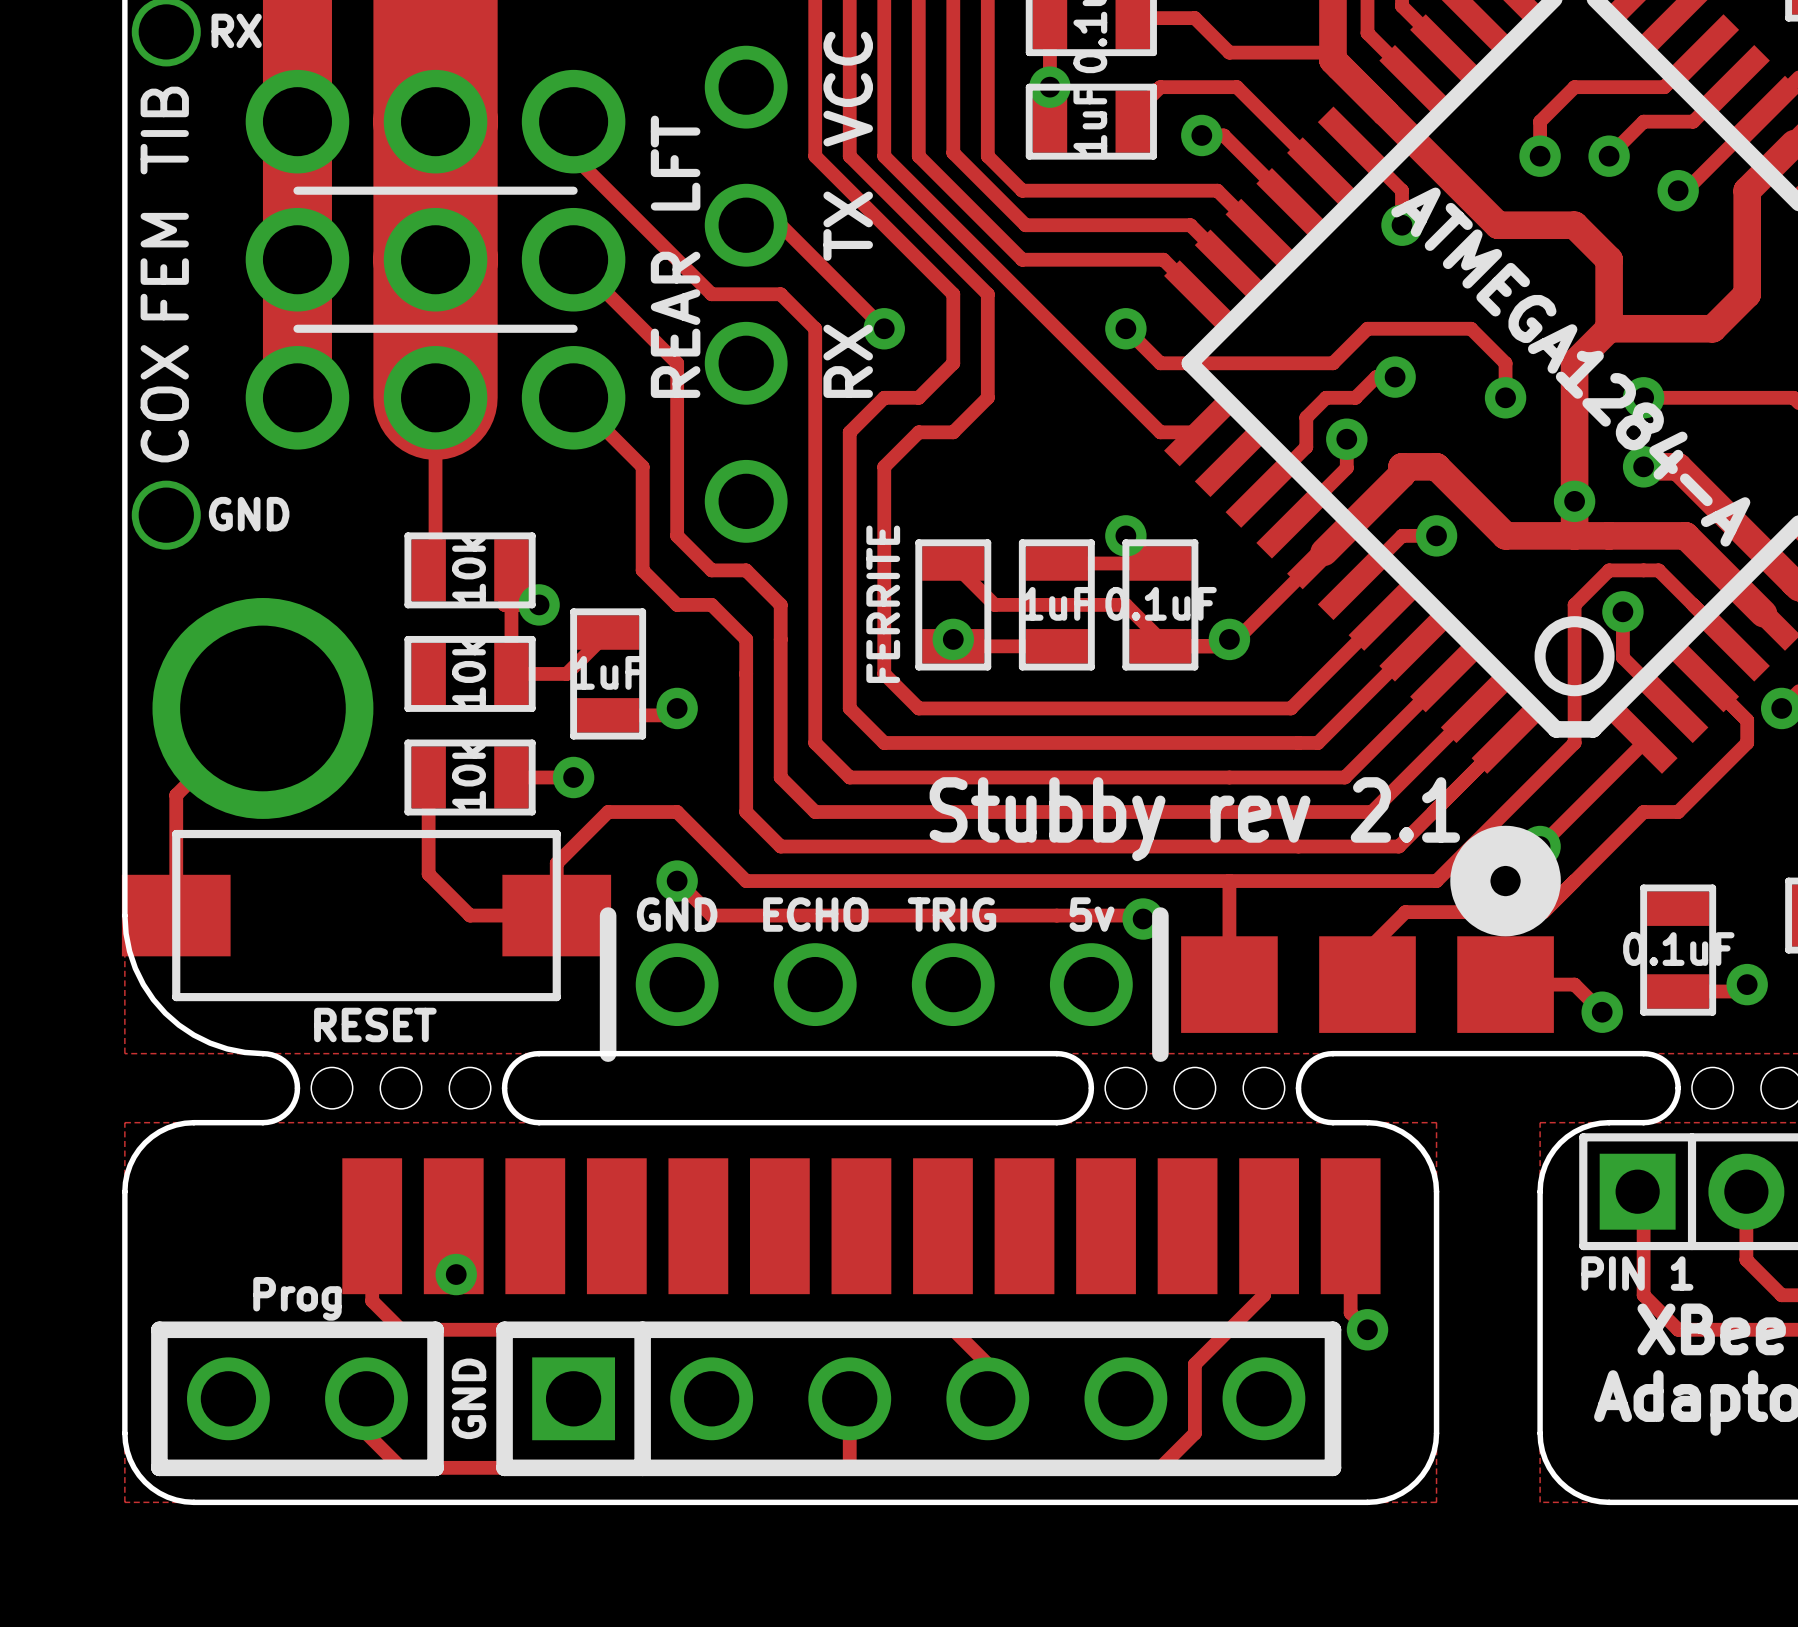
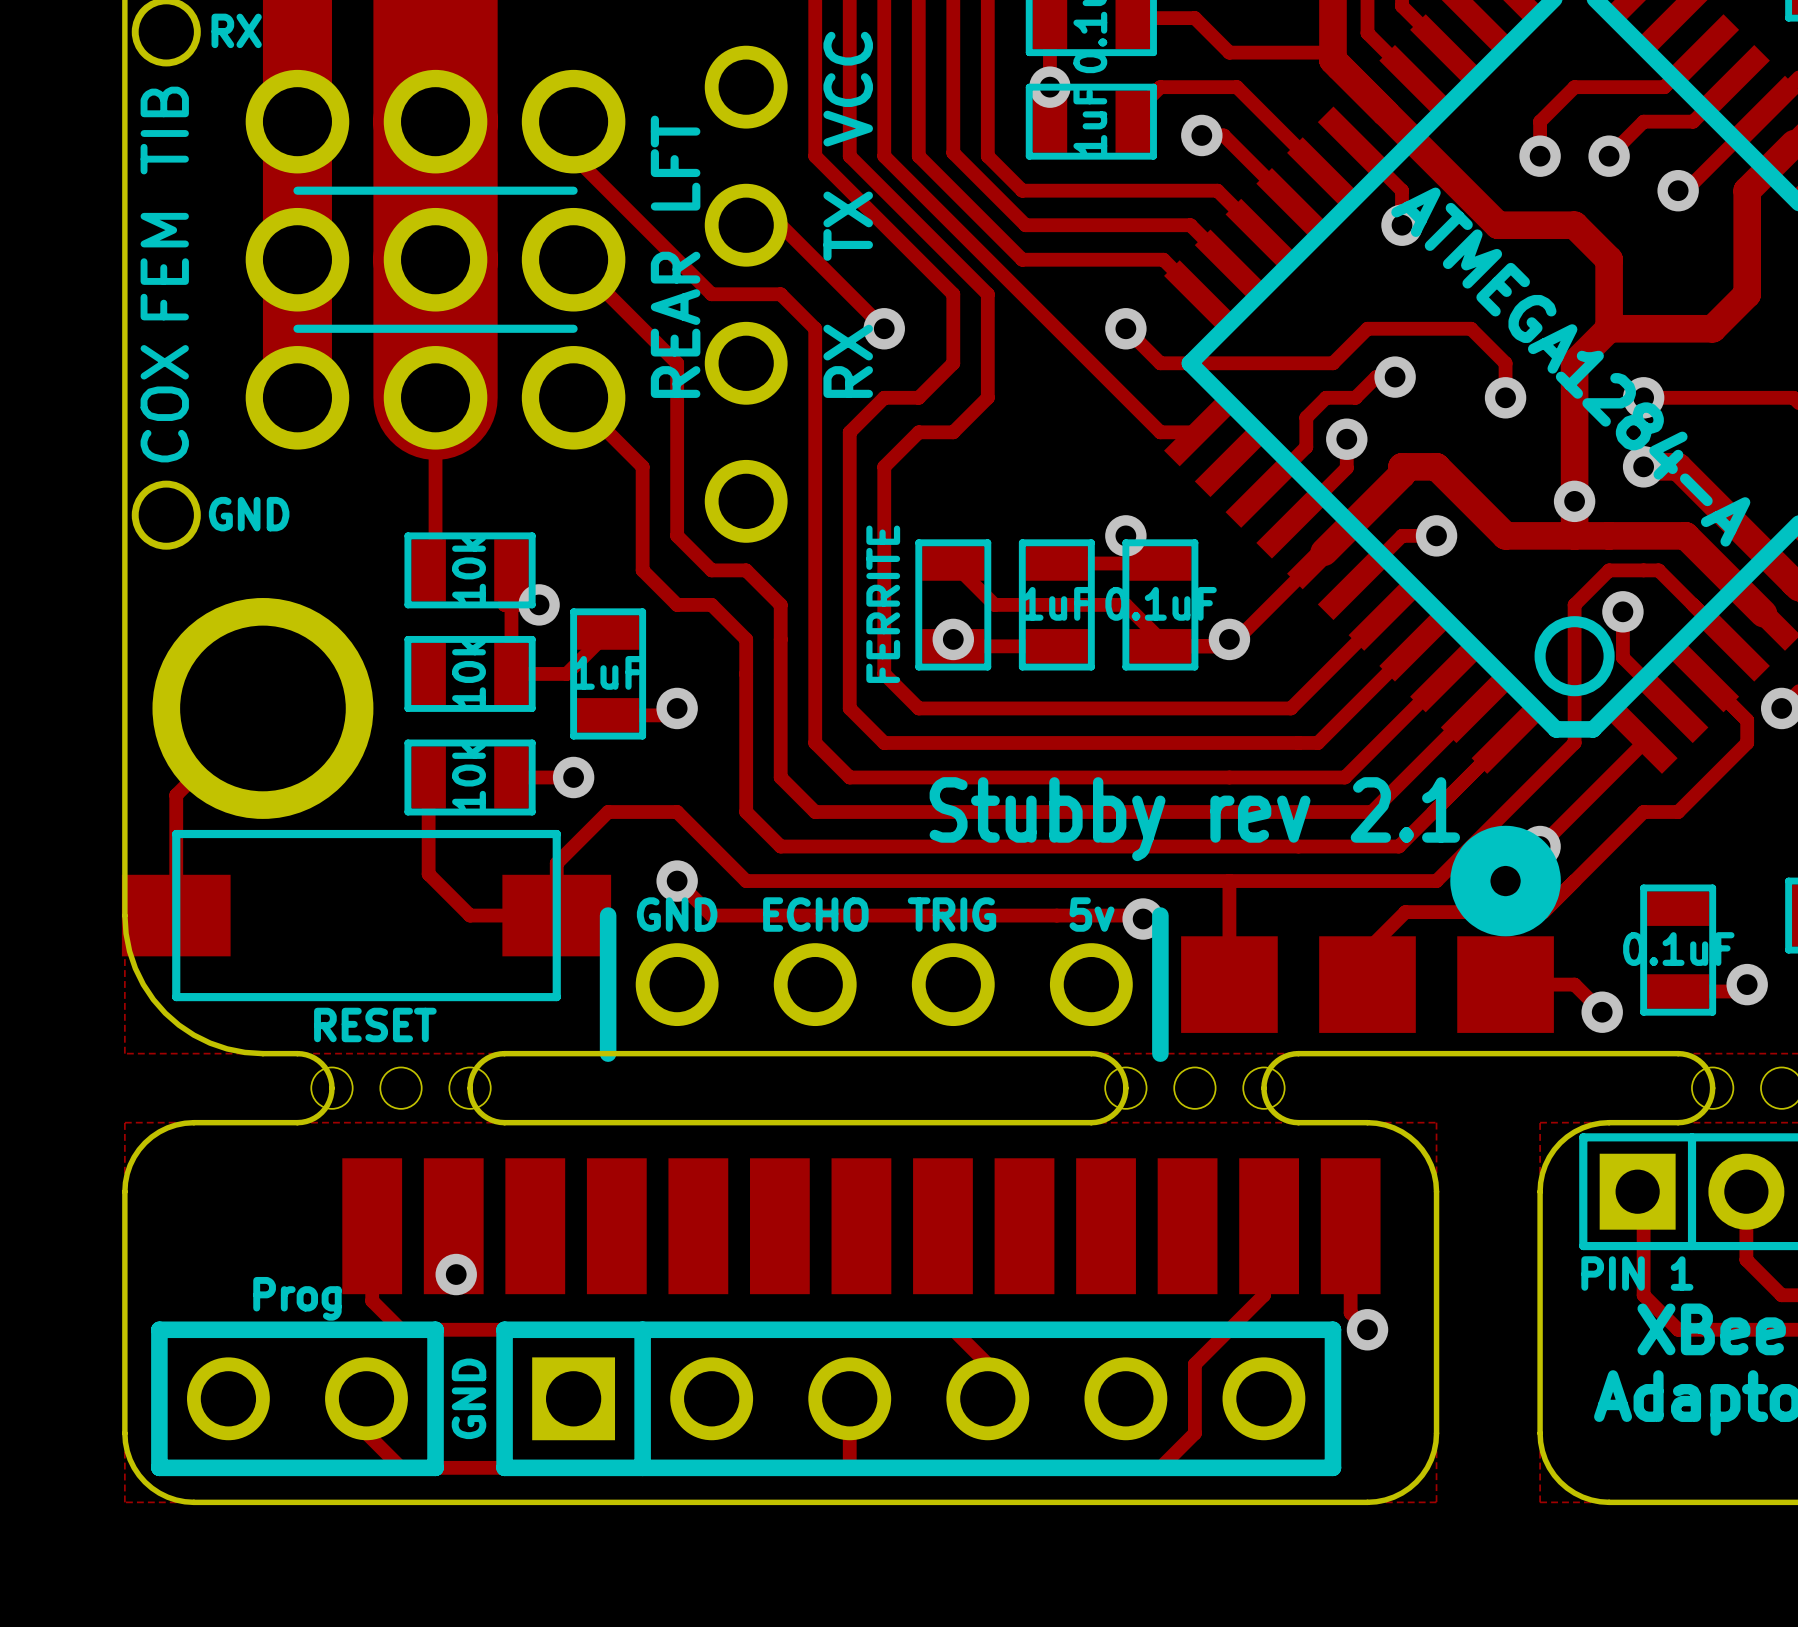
board edge: (262, 1053) (276, 1056) (287, 1063) (294, 1074) (297, 1088) (294, 1101) (287, 1112) (276, 1120) (262, 1122) -> (262, 1053) (301, 1053) (314, 1058) (327, 1070) (331, 1088) (327, 1105) (314, 1118) (301, 1122) (262, 1122)
board edge: (539, 1053) (525, 1056) (514, 1063) (507, 1074) (504, 1088) (507, 1101) (514, 1112) (525, 1120) (539, 1122) -> (539, 1053) (500, 1053) (487, 1058) (474, 1070) (470, 1088) (474, 1105) (487, 1118) (500, 1122) (539, 1122)
board edge: (1056, 1053) (1070, 1056) (1081, 1063) (1088, 1074) (1091, 1088) (1088, 1101) (1081, 1112) (1070, 1120) (1056, 1122) -> (1056, 1053) (1095, 1053) (1108, 1058) (1121, 1070) (1125, 1088) (1121, 1105) (1108, 1118) (1095, 1122) (1056, 1122)
board edge: (1332, 1053) (1319, 1056) (1308, 1063) (1301, 1074) (1298, 1088) (1301, 1101) (1308, 1112) (1319, 1120) (1332, 1122) -> (1332, 1053) (1293, 1053) (1281, 1058) (1268, 1070) (1263, 1088) (1268, 1105) (1281, 1118) (1293, 1122) (1332, 1122)
board edge: (1643, 1053) (1656, 1056) (1668, 1063) (1675, 1074) (1678, 1088) -> (1643, 1053) (1682, 1053) (1695, 1058) (1708, 1070) (1712, 1088) (1708, 1105) (1695, 1118) (1682, 1122) (1643, 1122)
board edge: (1678, 1088) (1675, 1101) (1668, 1112) (1656, 1120) (1643, 1122) -> none

